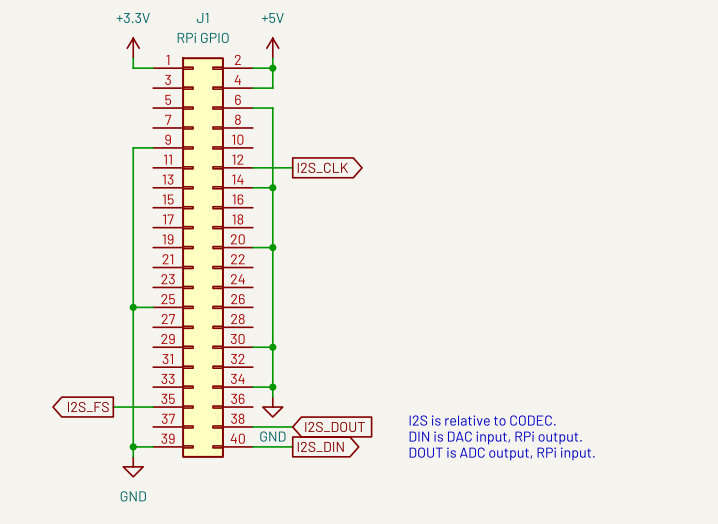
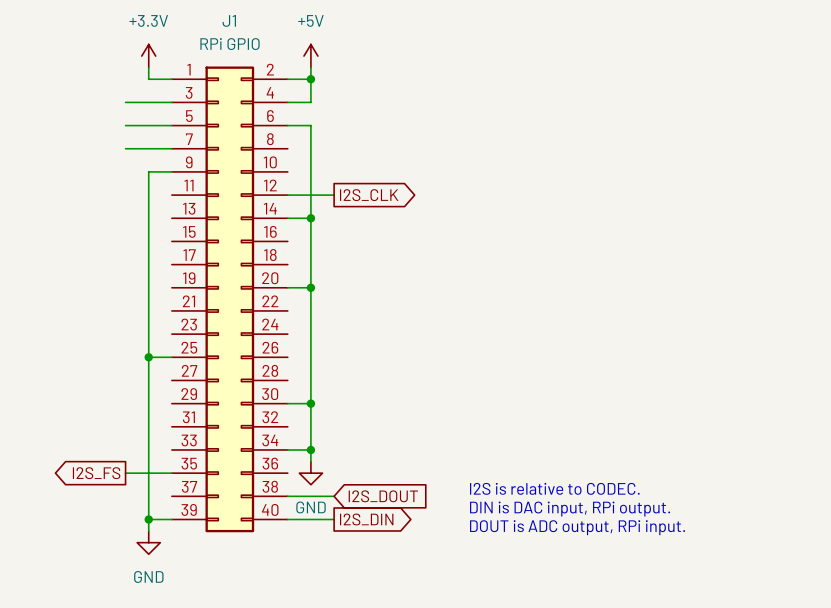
wire: none -> (125, 102) (171, 102)
wire: none -> (125, 125) (171, 125)
wire: none -> (125, 148) (171, 148)

